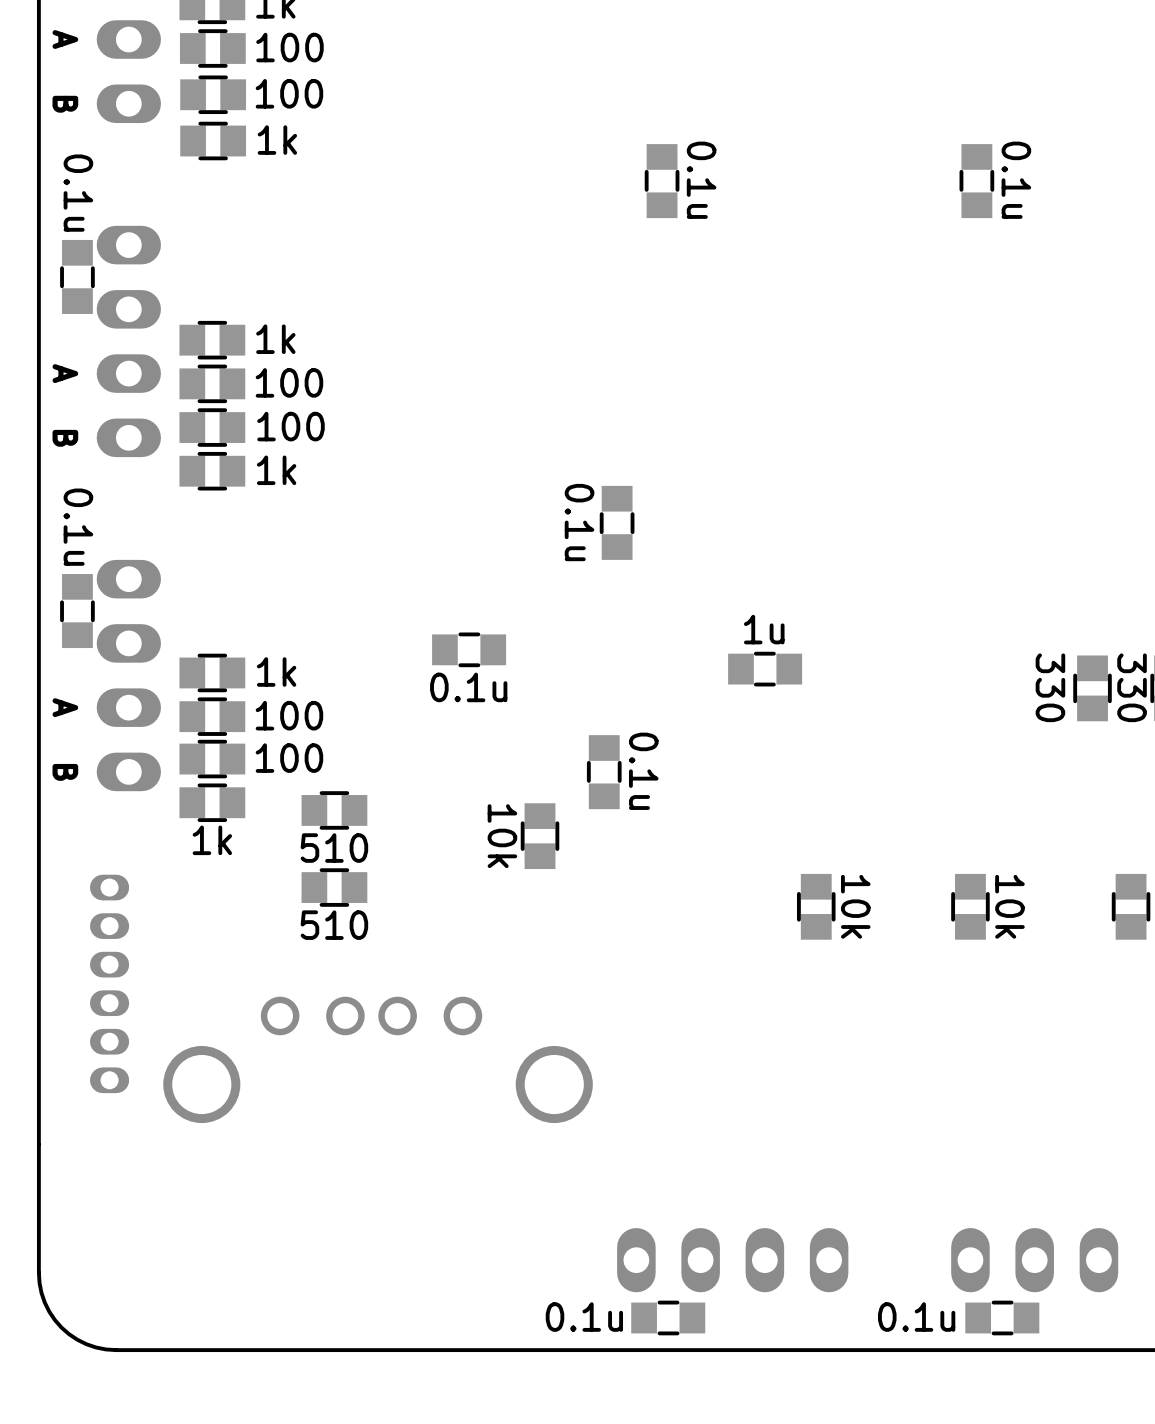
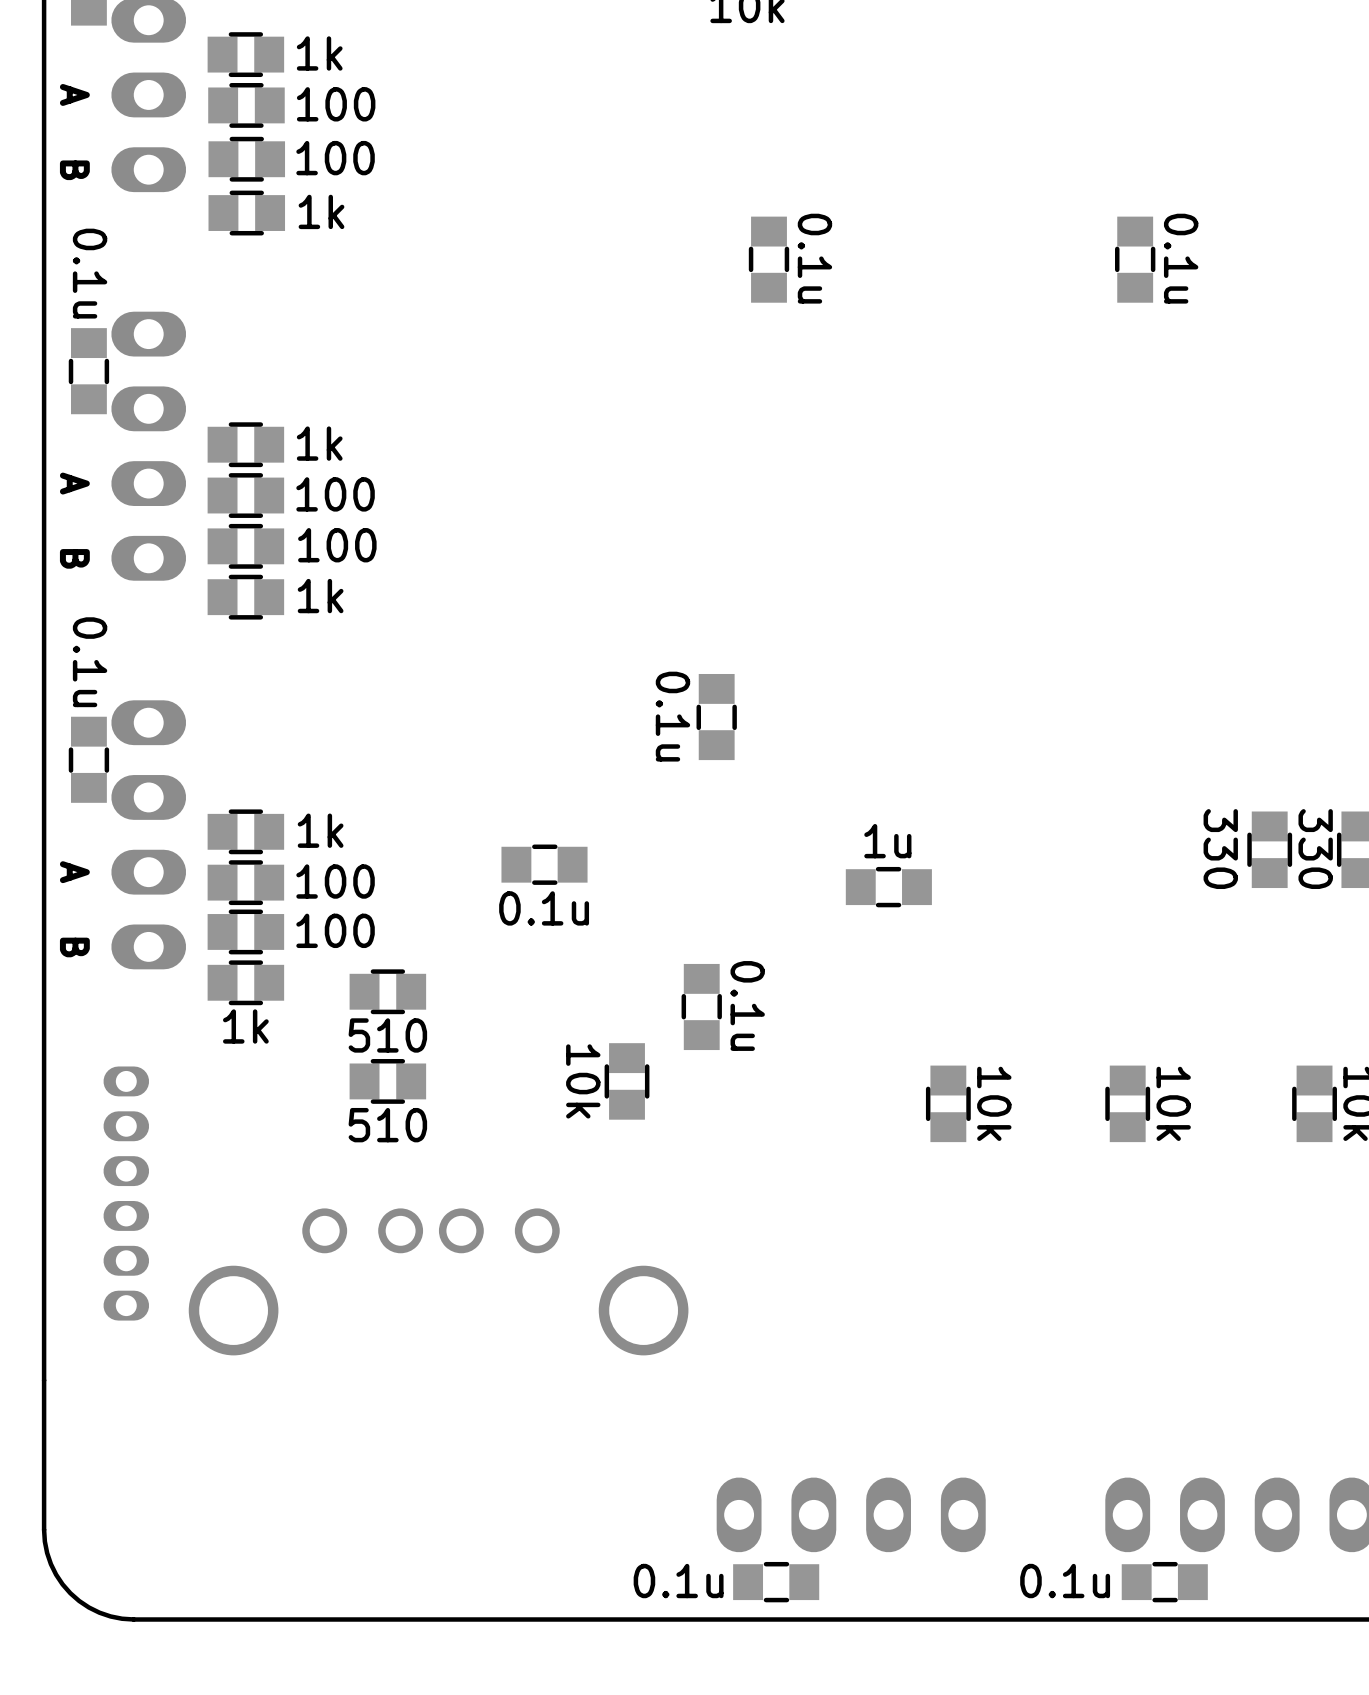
part position: (617, 522) -> (716, 717)
part position: (469, 649) -> (544, 864)
part position: (765, 669) -> (888, 887)
part position: (604, 772) -> (701, 1006)
part position: (540, 836) -> (627, 1081)

